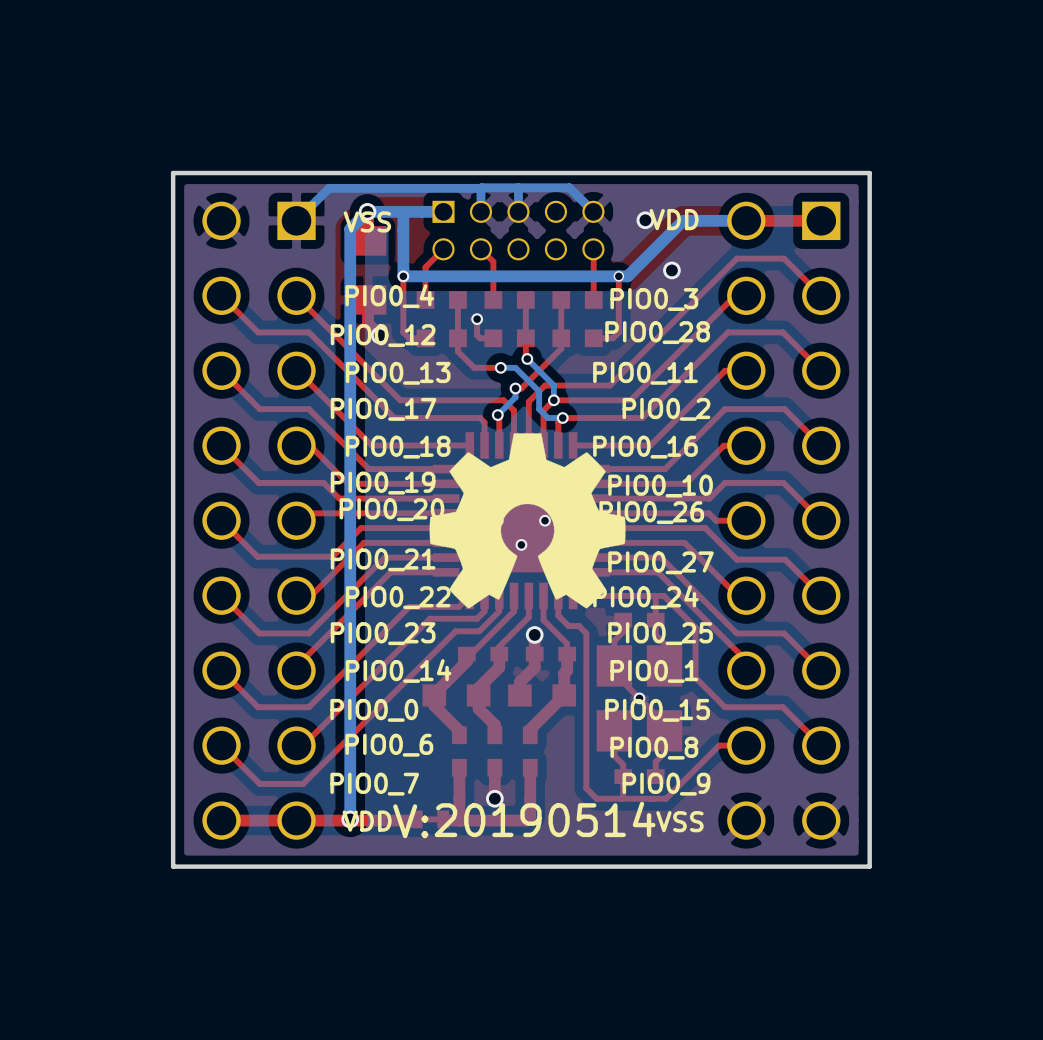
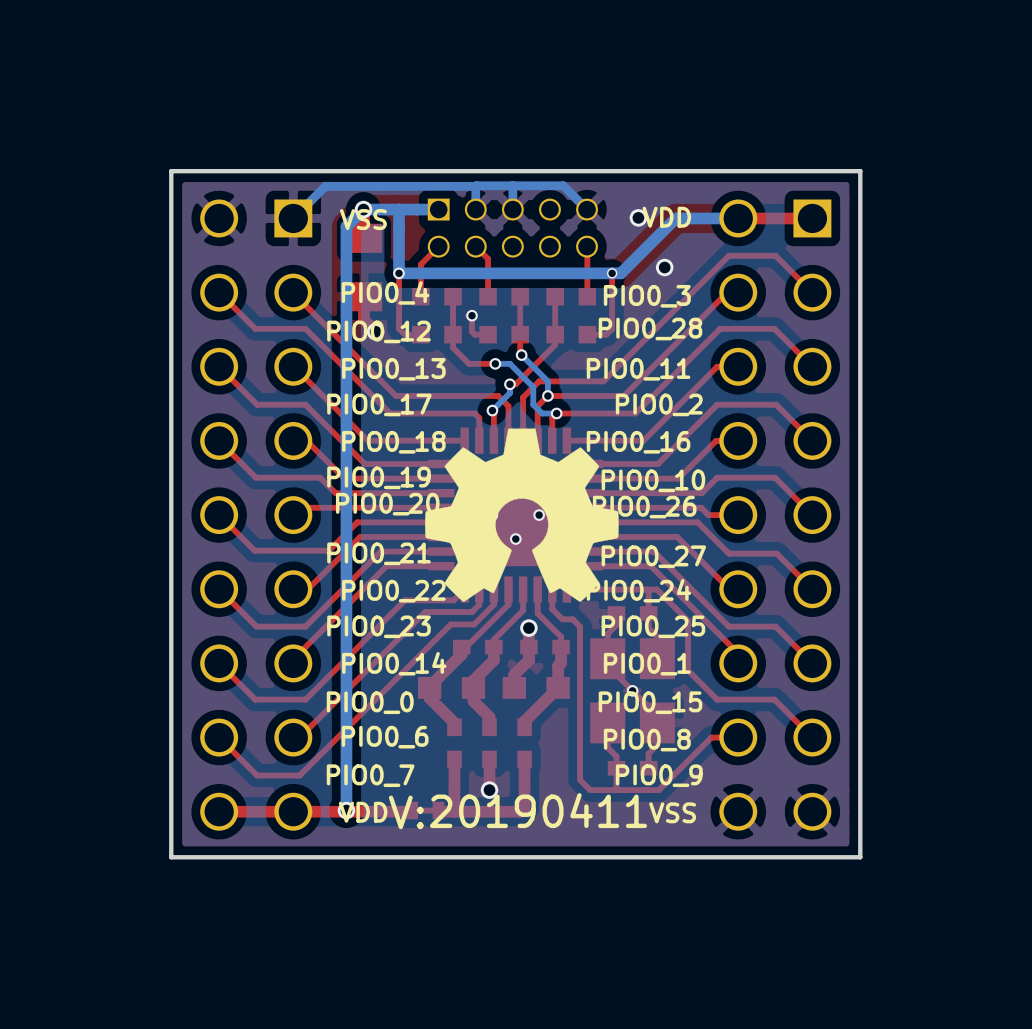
drawing shape: [393, 801, 656, 839] -> [388, 793, 648, 830]

